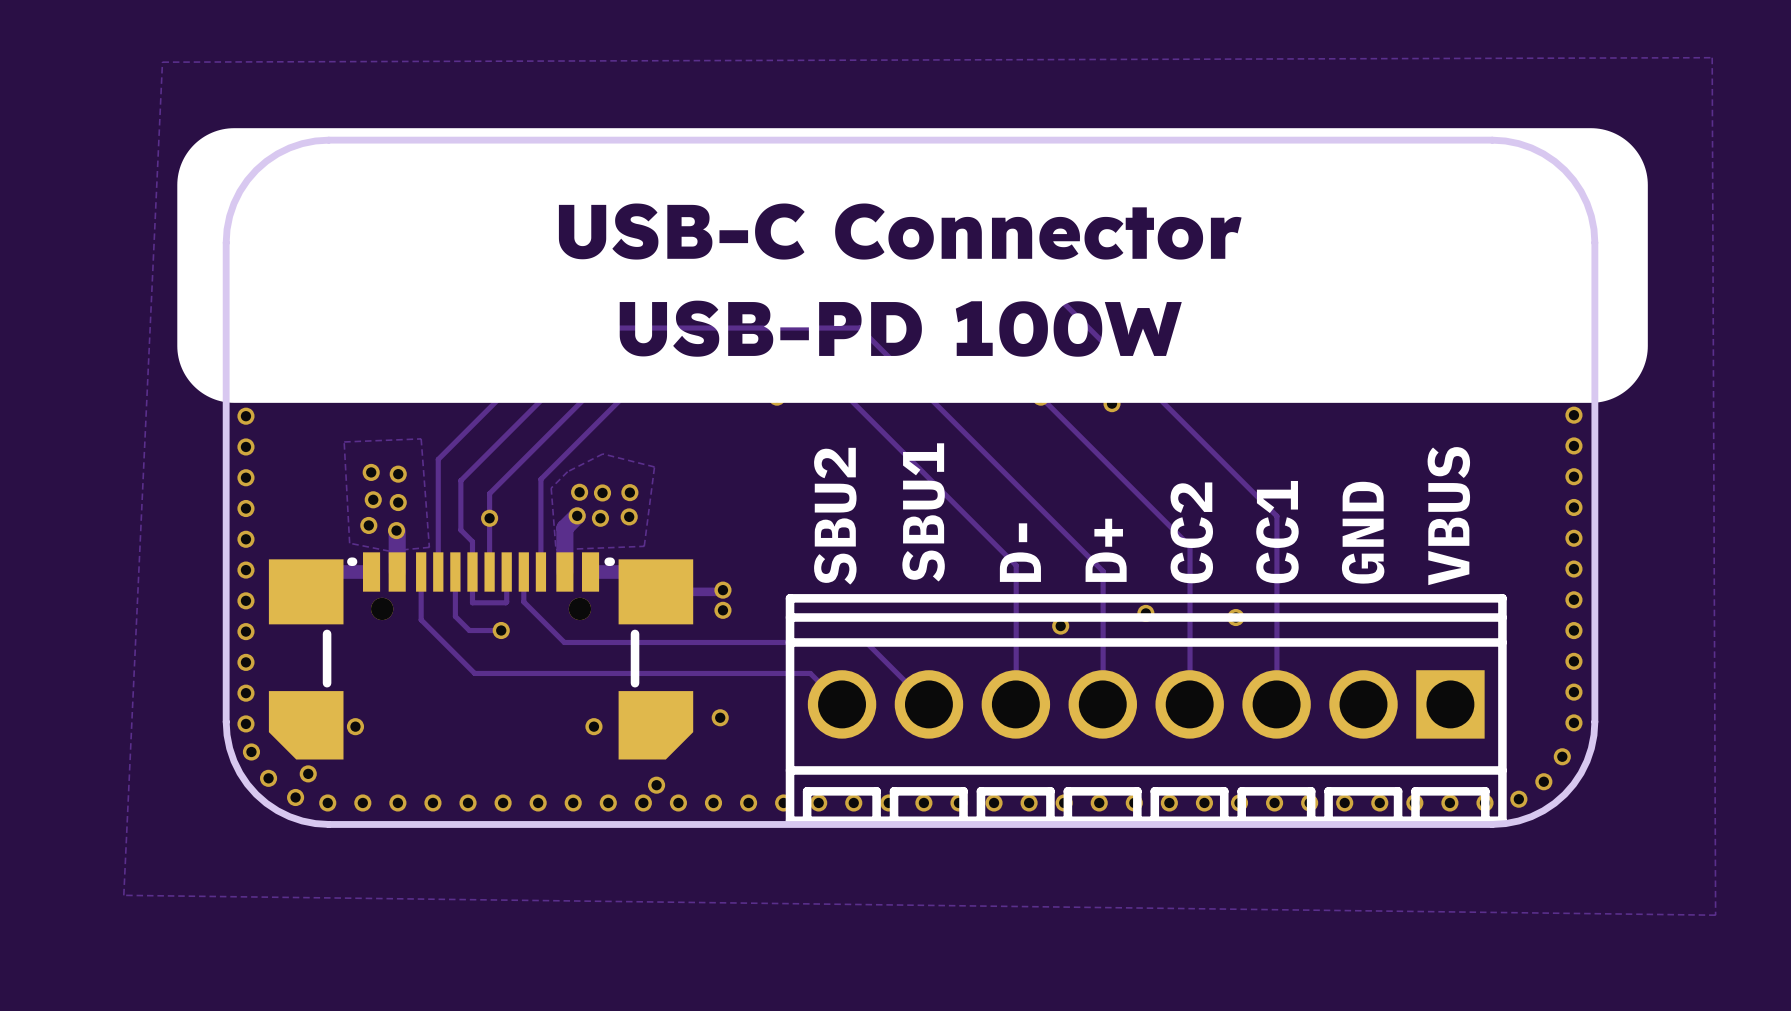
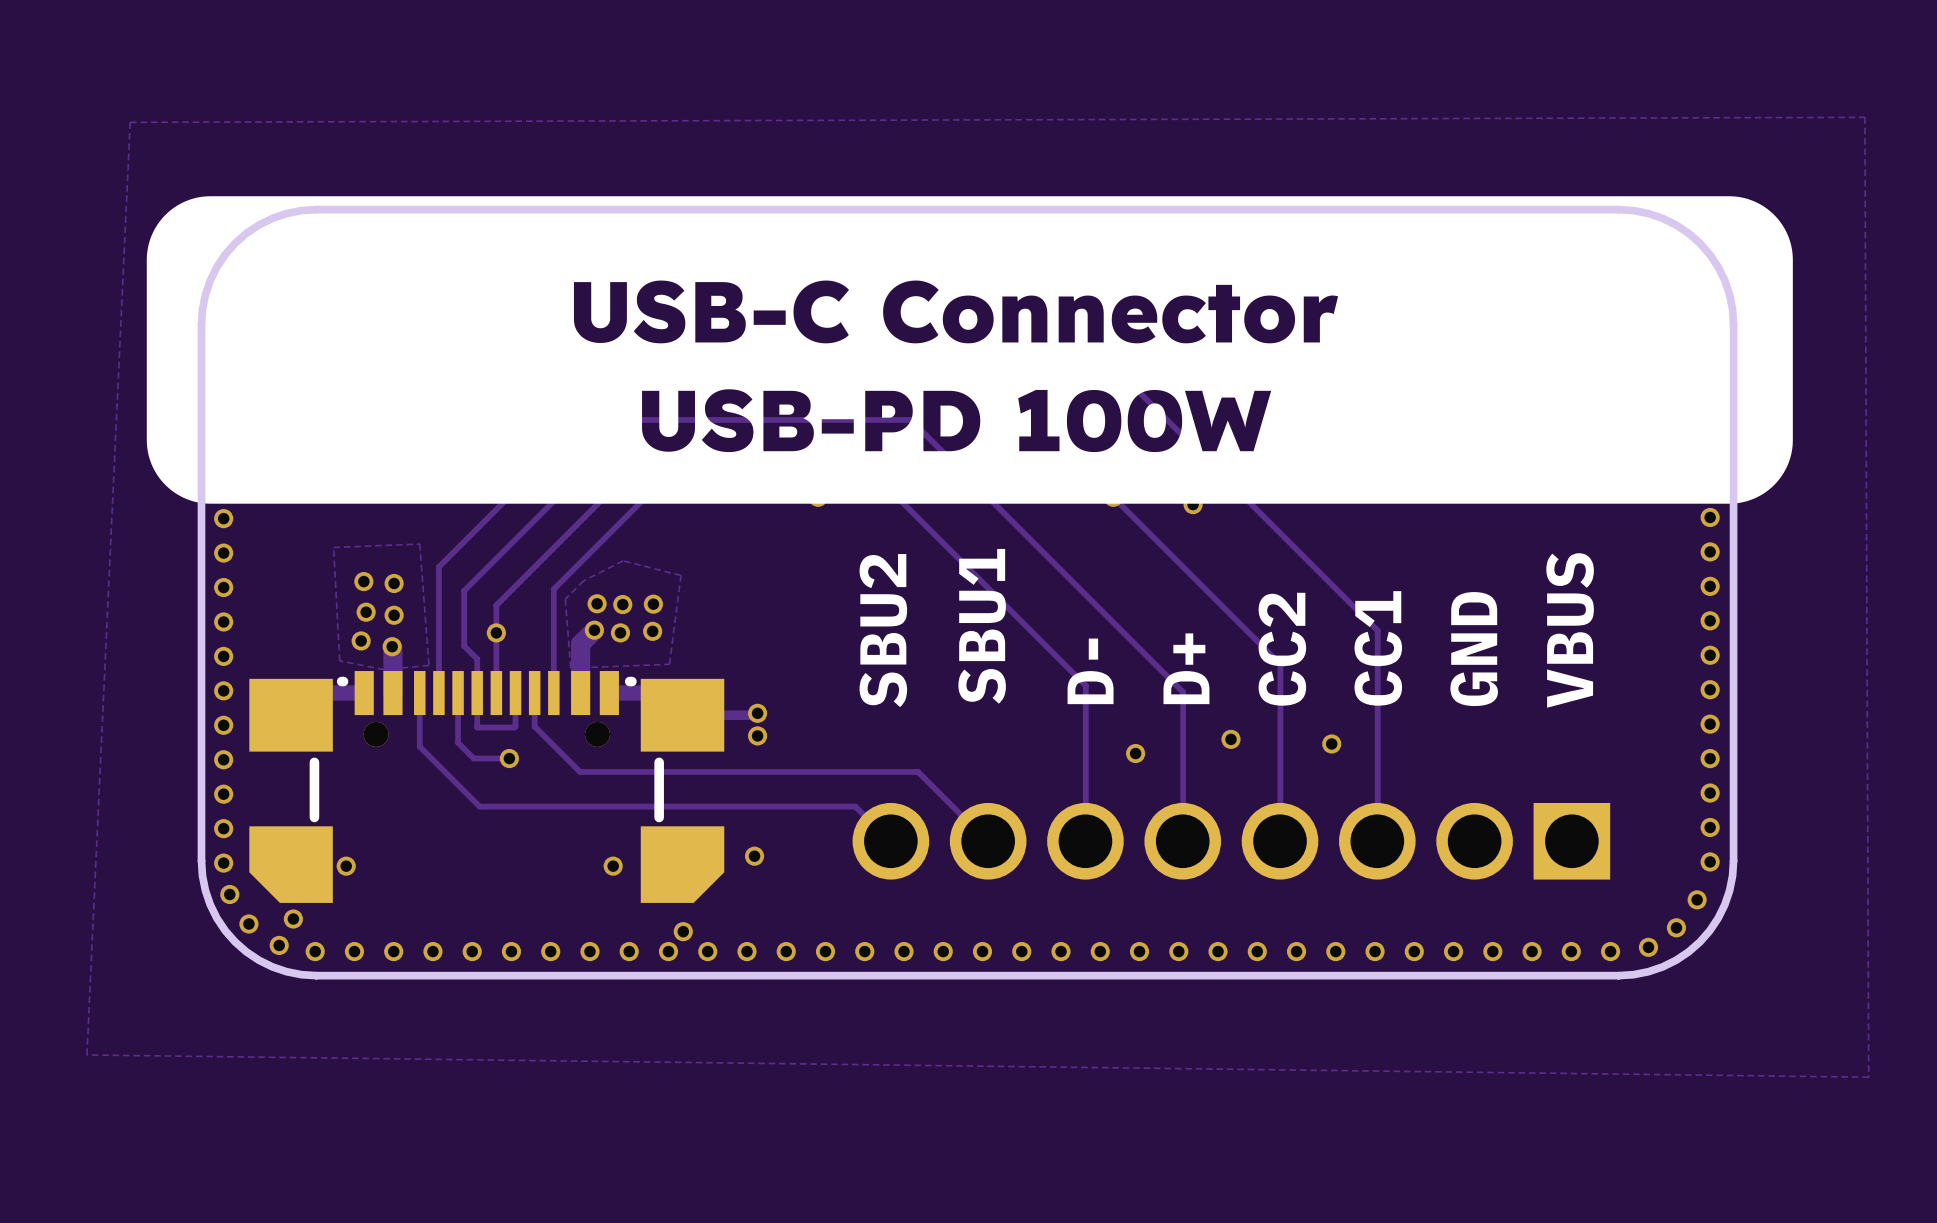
part footprint: [785, 594, 1507, 826] -> [852, 802, 1611, 880]

